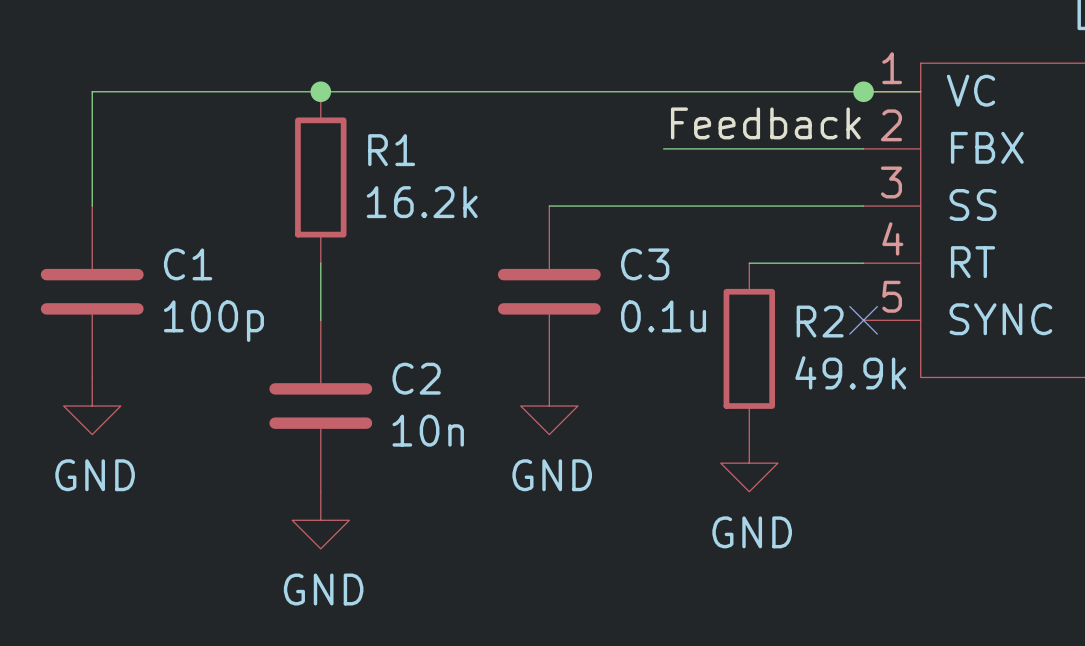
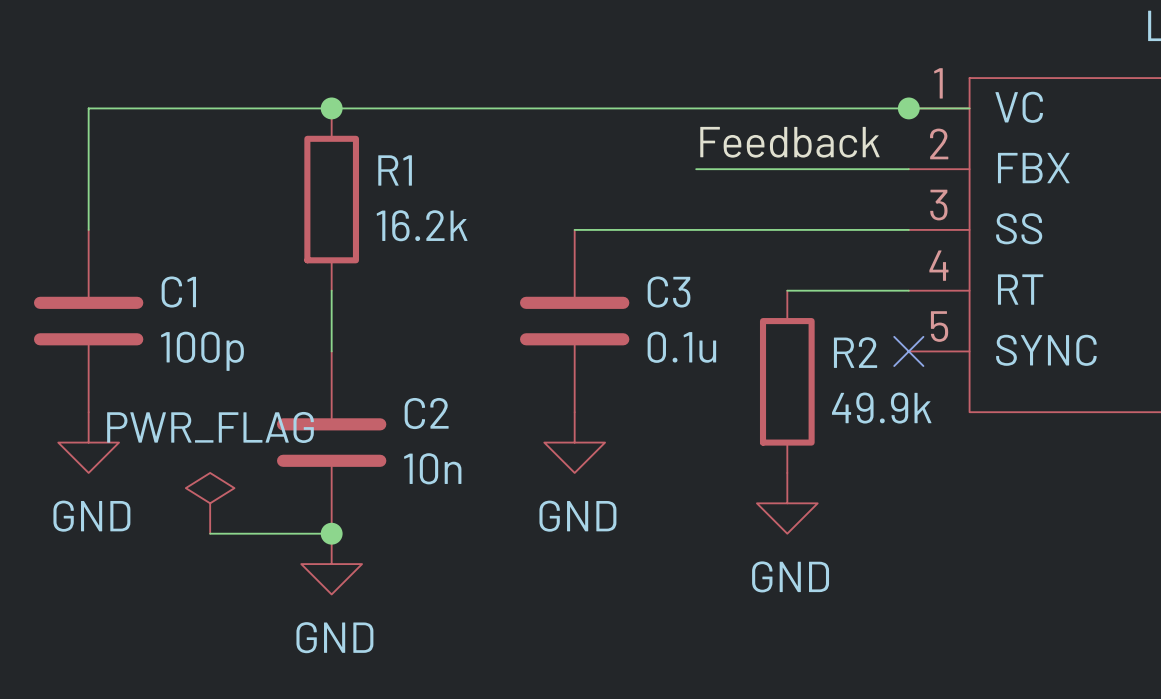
power symbol: none -> PWR_FLAG (210, 503)
wire: none -> (210, 533) (331, 533)
junction: none -> (331, 533)

